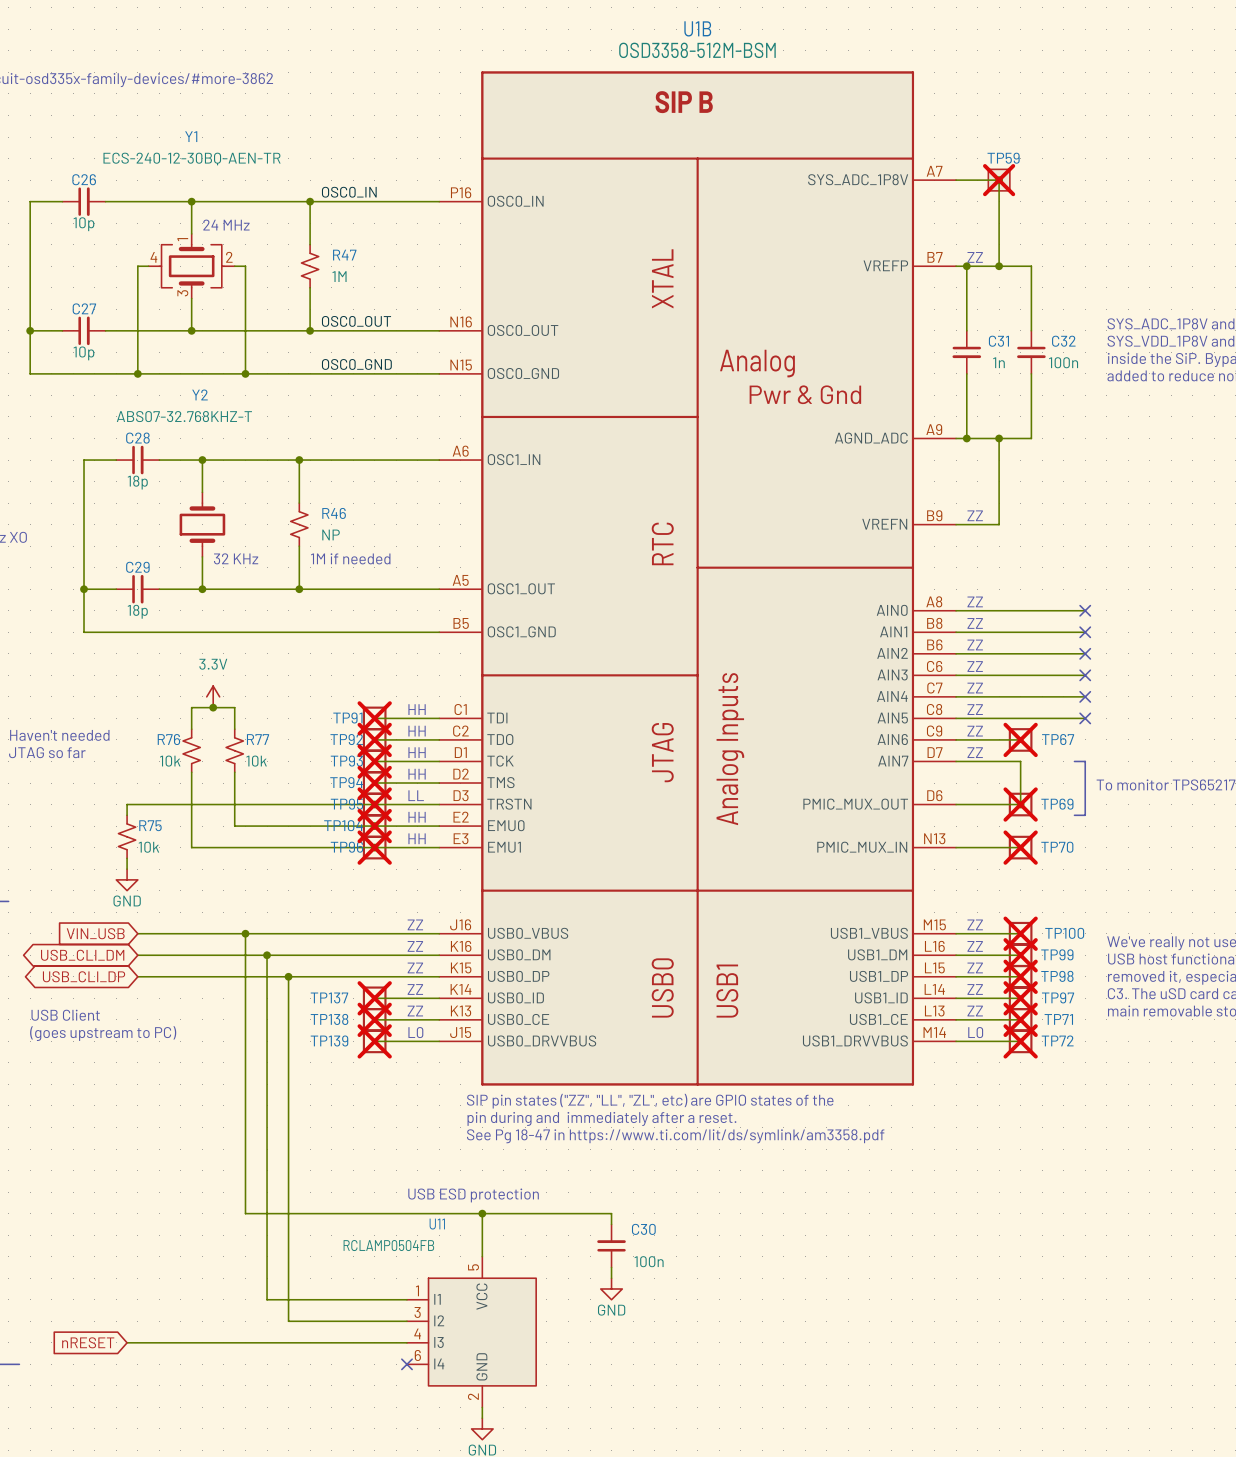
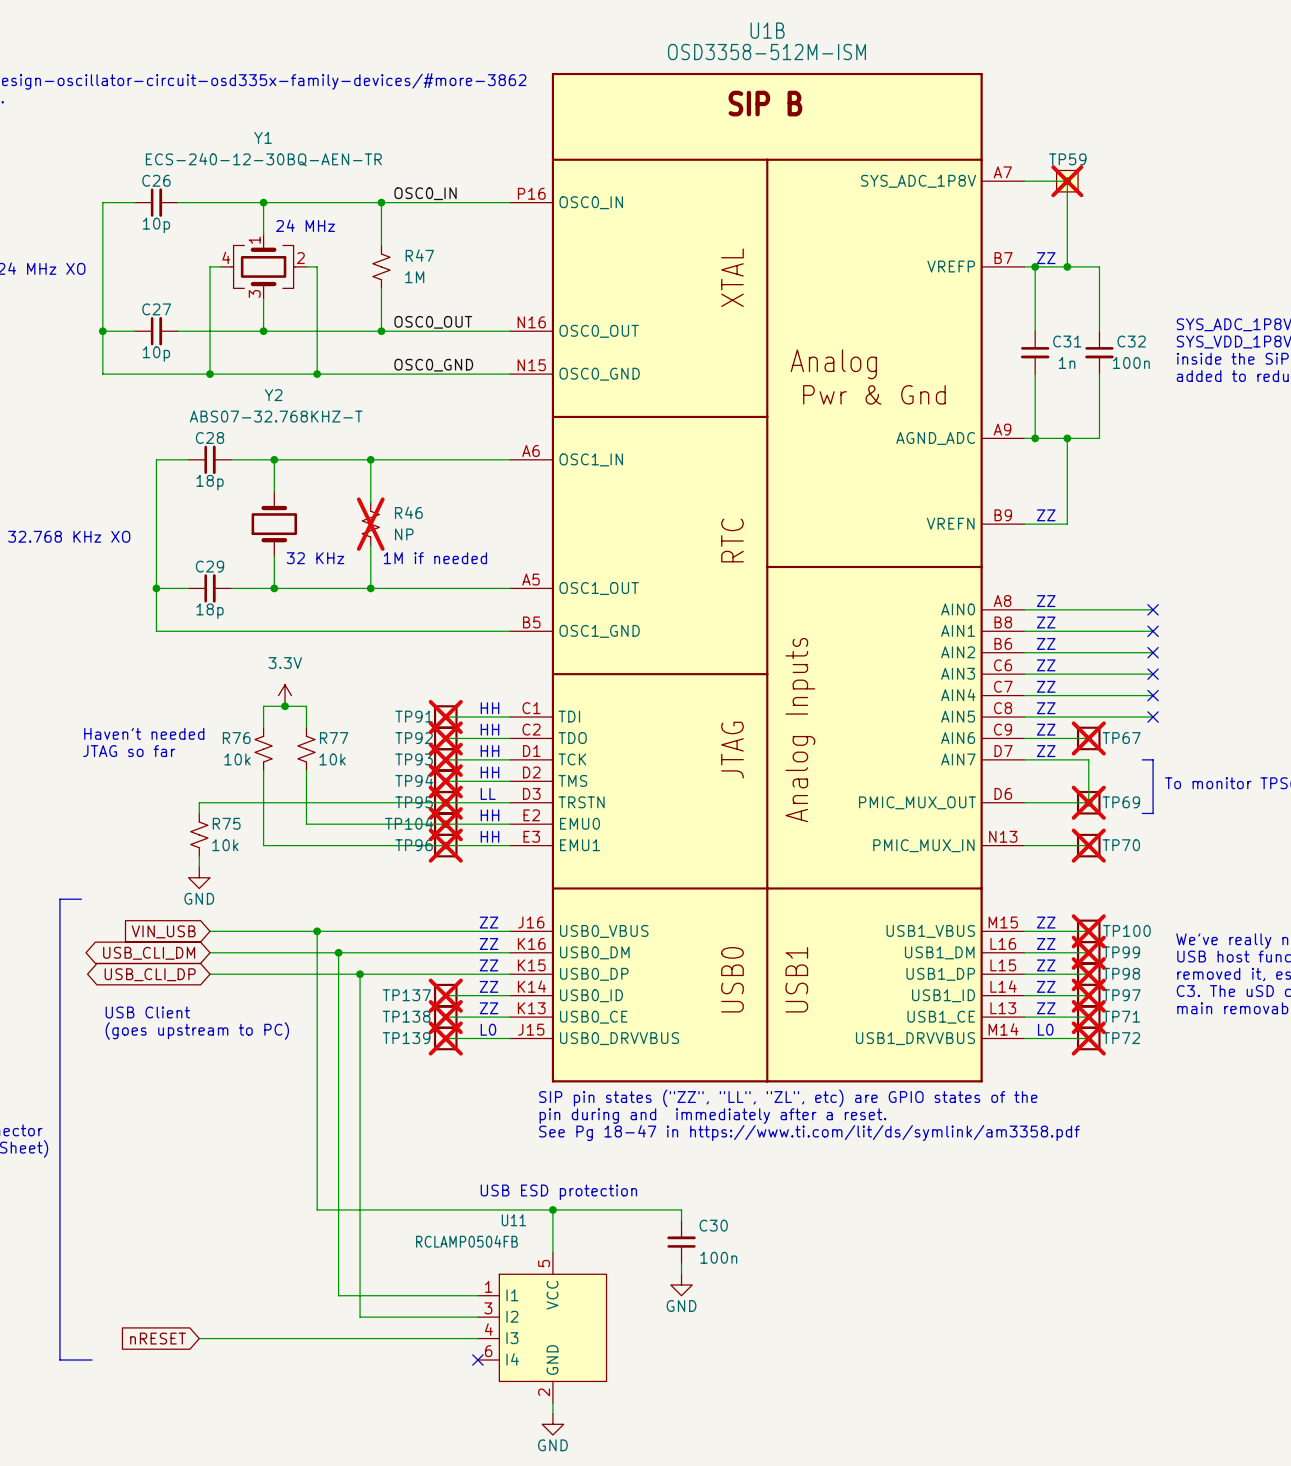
U1B value: OSD3358-512M-BSM (697, 50) -> OSD3358-512M-ISM (766, 52)
R46 do-not-place cross: none -> (370, 524)

